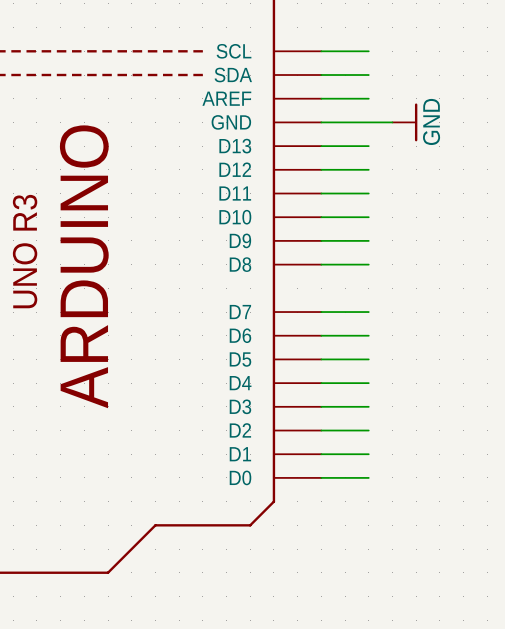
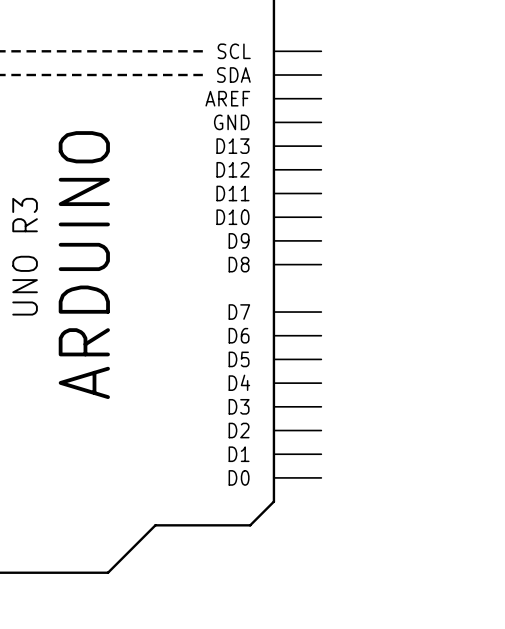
wire: (321, 51) (368, 51) -> none
wire: (321, 75) (368, 75) -> none
wire: (321, 98) (368, 98) -> none
wire: (321, 122) (392, 122) -> none
power symbol: GND (404, 122) -> none
wire: (321, 146) (368, 146) -> none
wire: (321, 169) (368, 169) -> none
wire: (321, 193) (368, 193) -> none
wire: (321, 217) (368, 217) -> none
wire: (321, 240) (368, 240) -> none
wire: (321, 264) (368, 264) -> none
wire: (321, 312) (368, 312) -> none
wire: (321, 335) (368, 335) -> none
wire: (321, 359) (368, 359) -> none
wire: (321, 383) (368, 383) -> none
wire: (321, 406) (368, 406) -> none
wire: (321, 430) (368, 430) -> none
wire: (321, 454) (368, 454) -> none
wire: (321, 477) (368, 477) -> none

